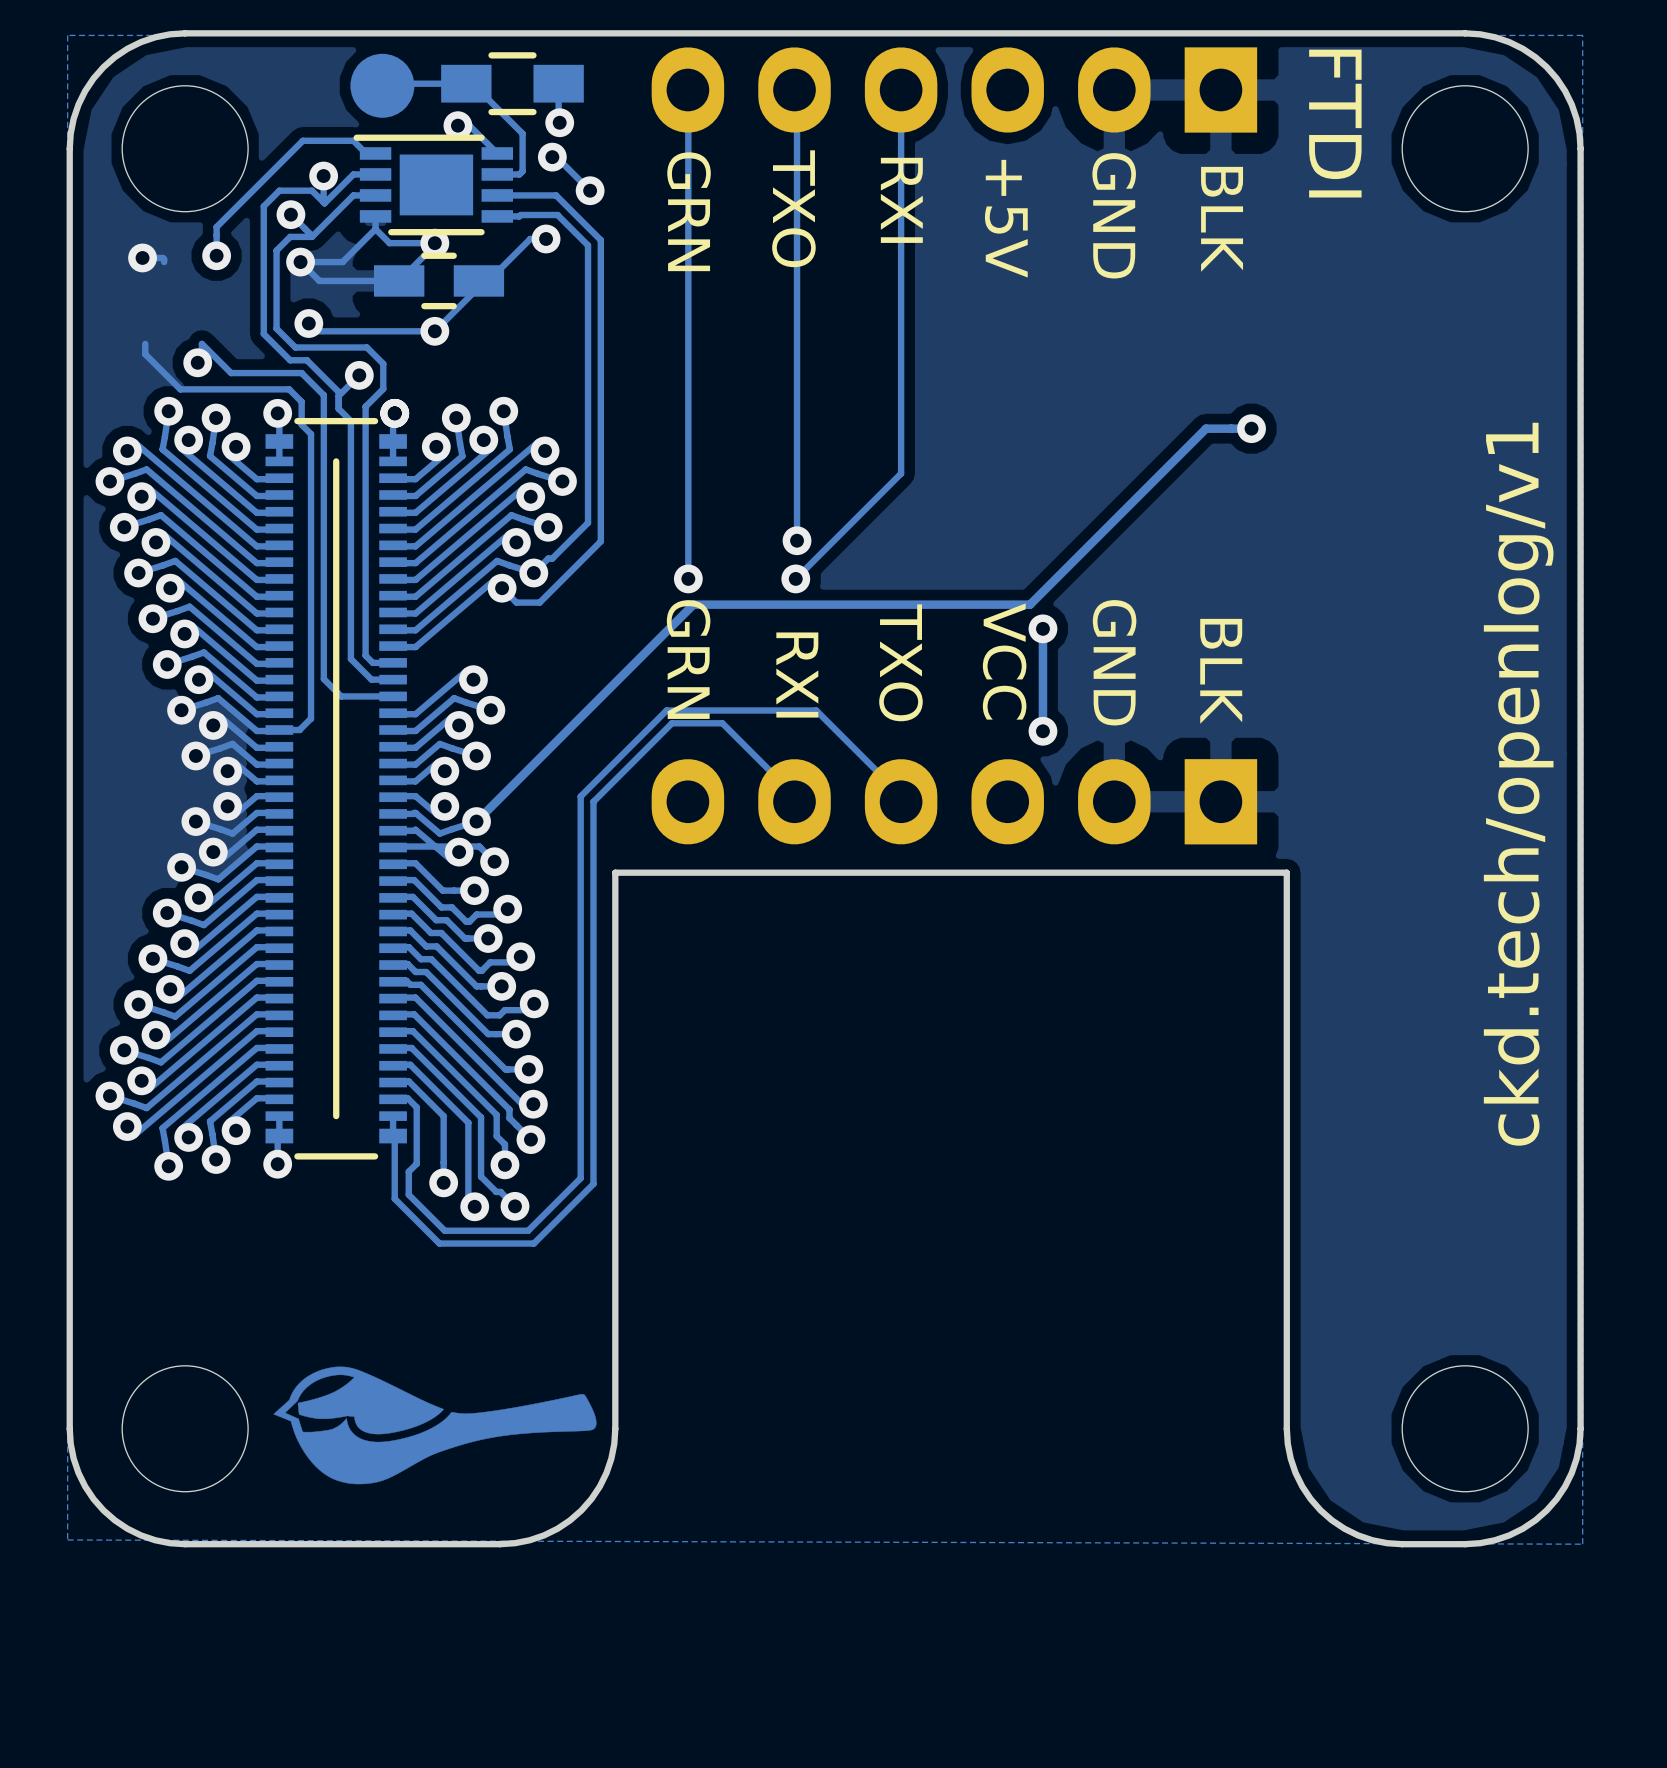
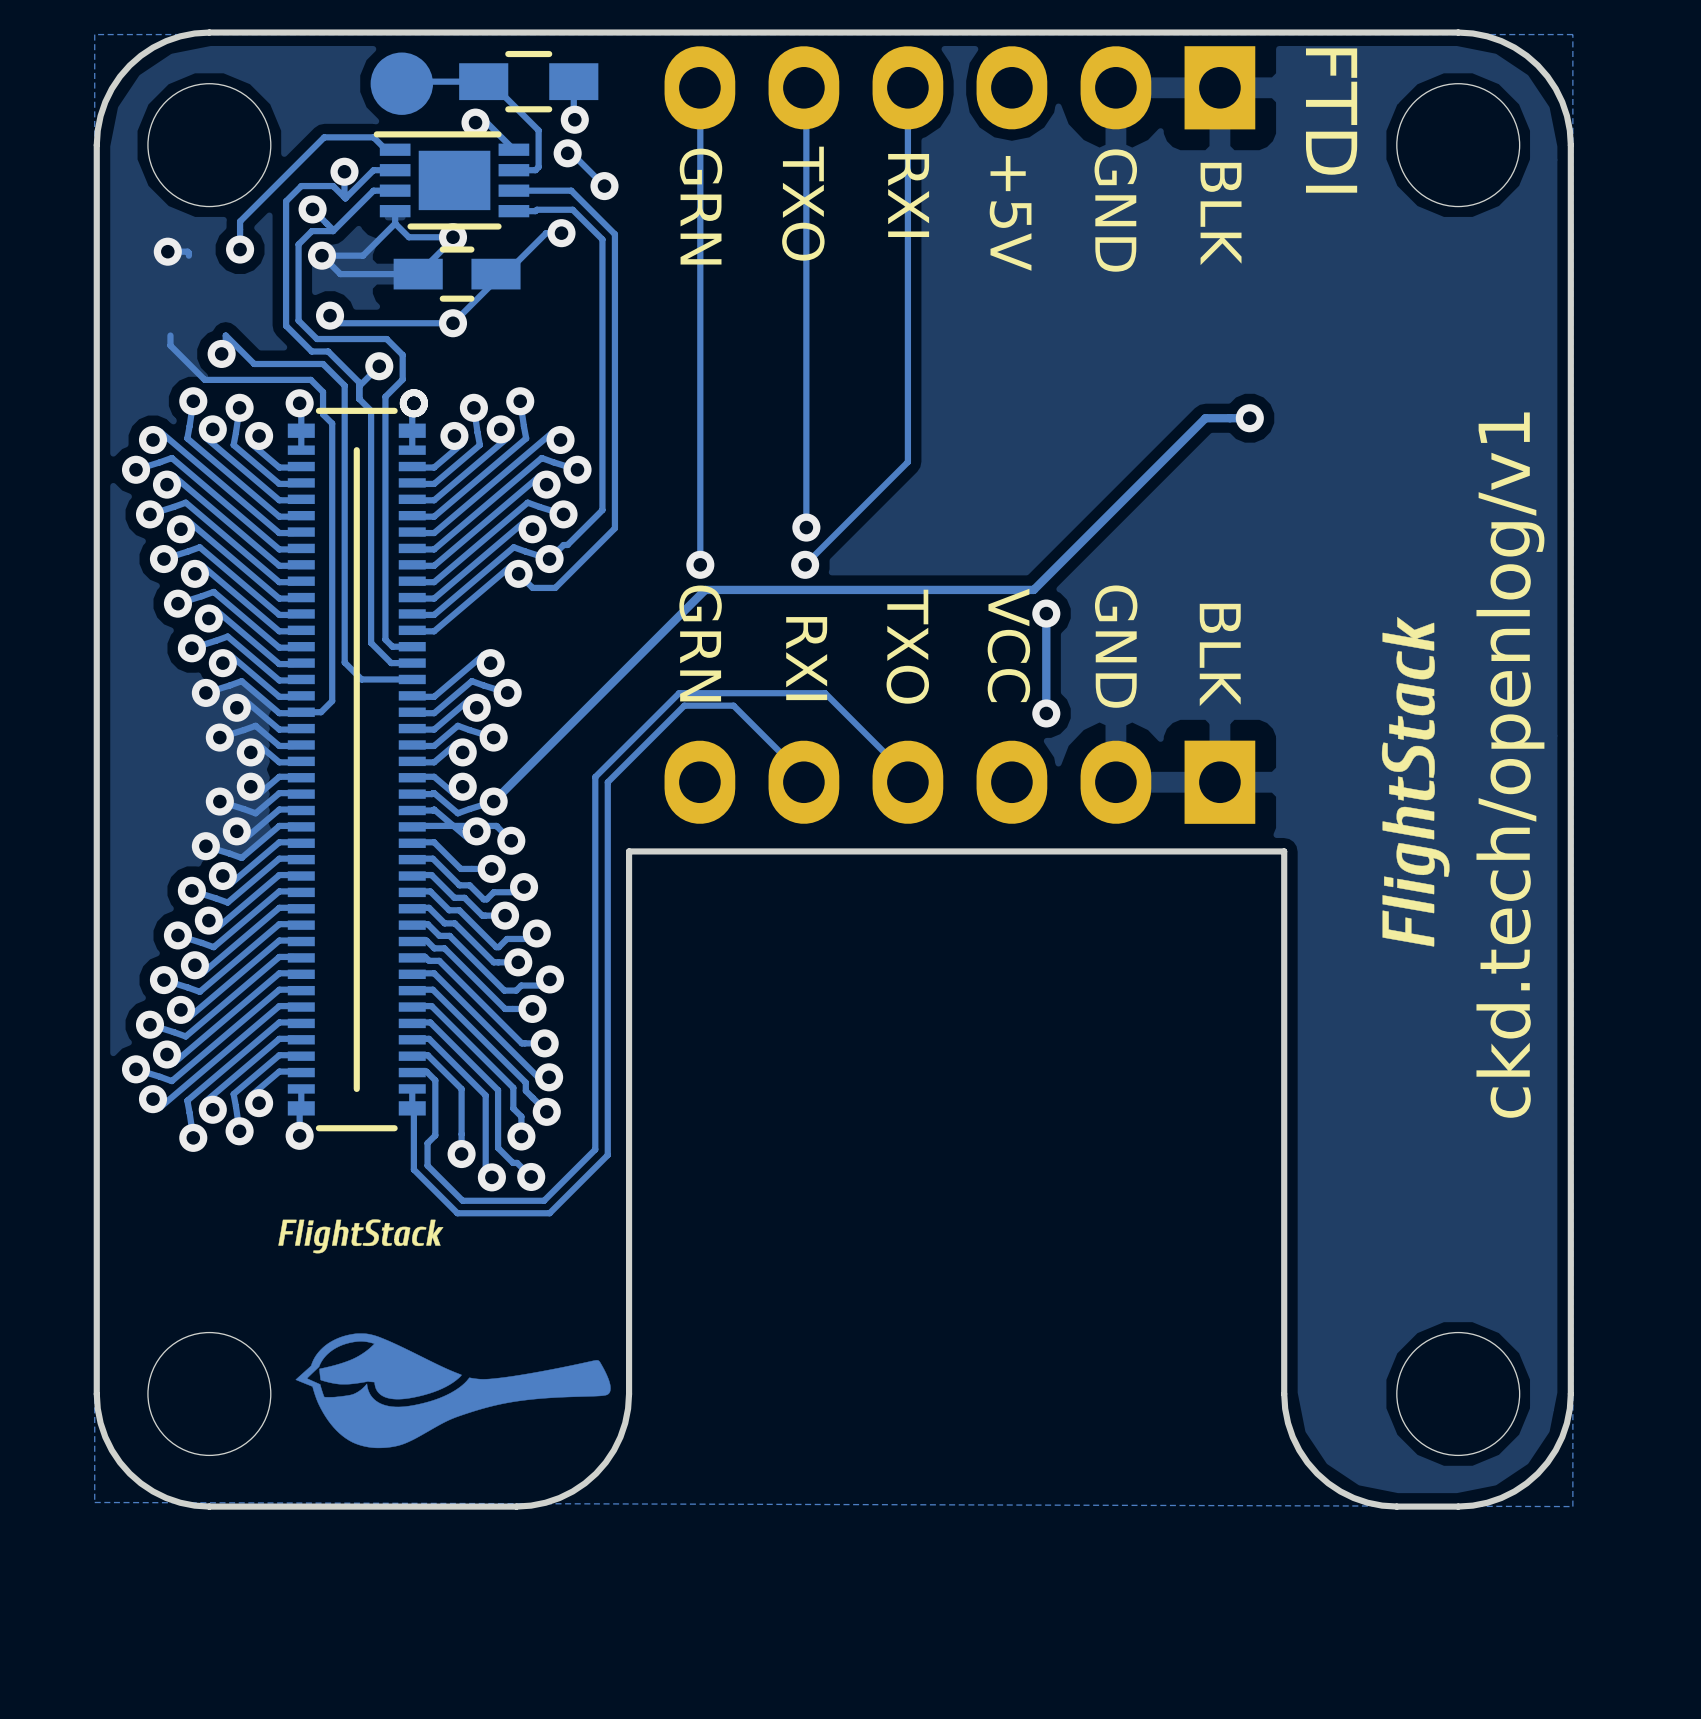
drawing: none -> [1381, 617, 1450, 947]
drawing: none -> [278, 1219, 444, 1254]

